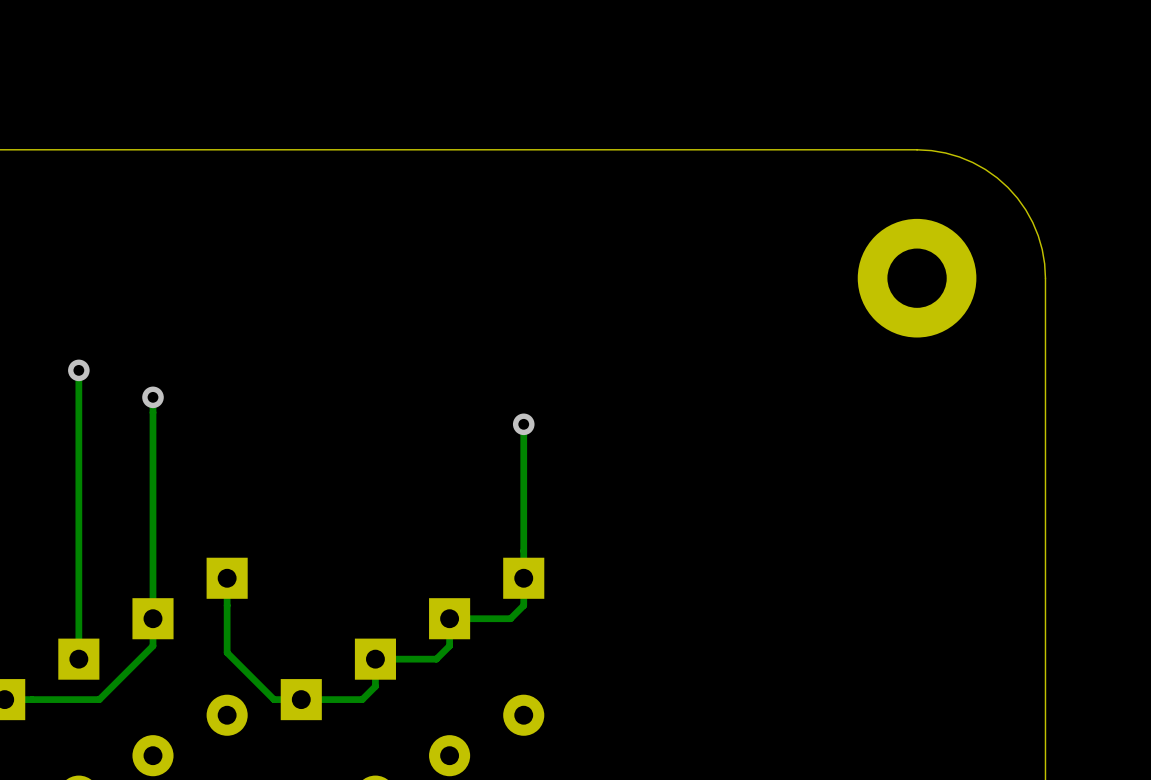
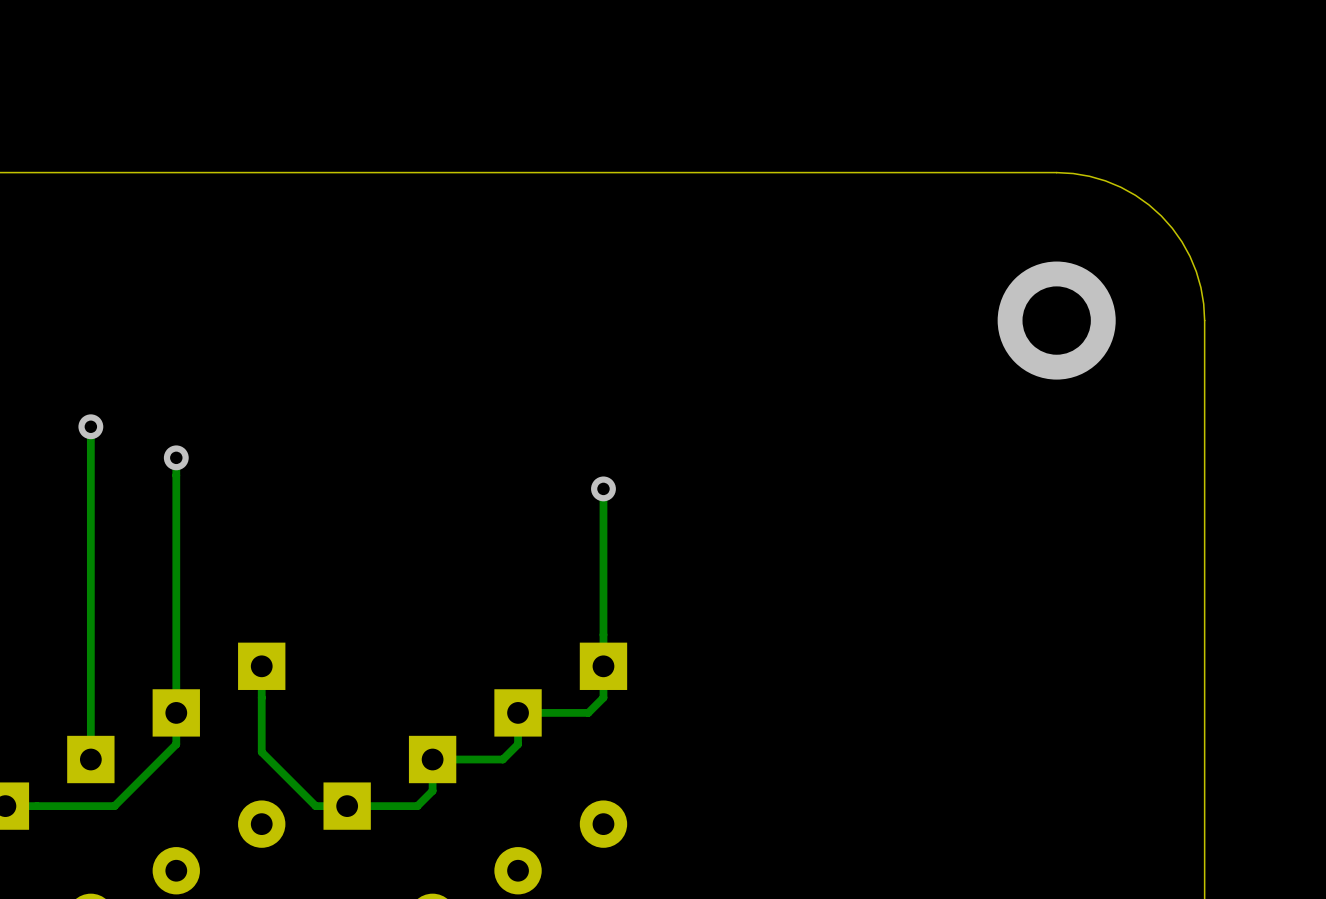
part: (917, 278) -> none
via: none -> (1056, 320)

